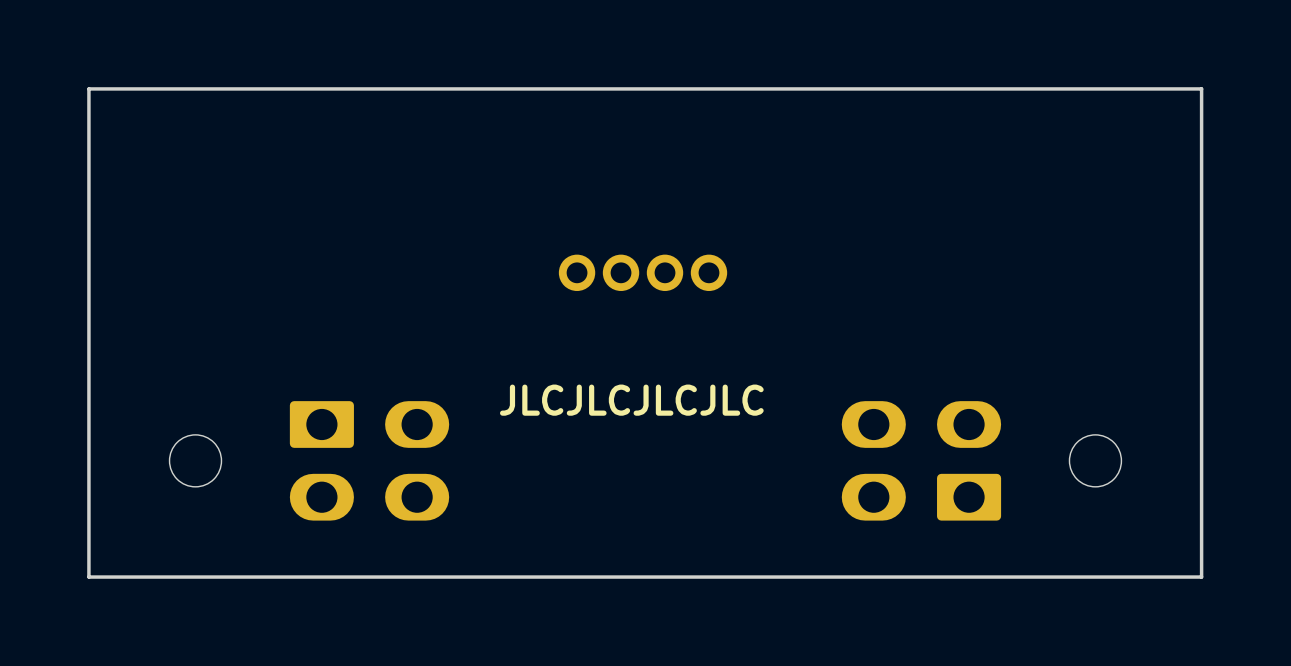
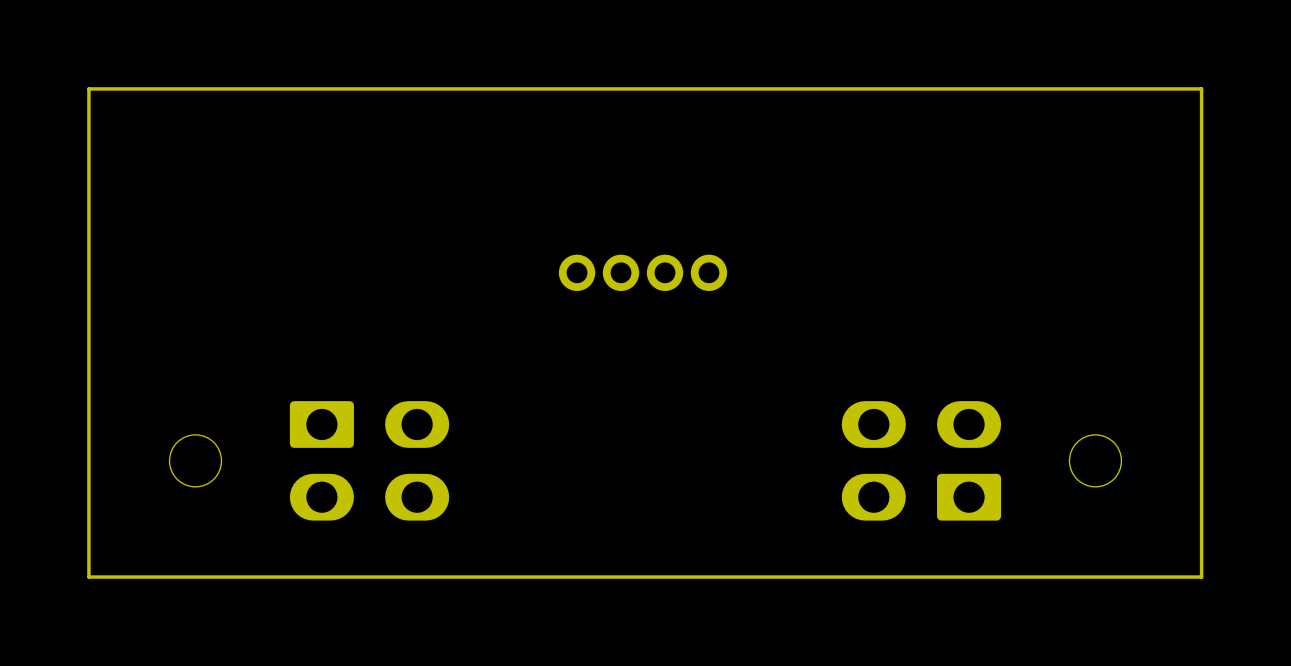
text: JLCJLCJLCJLC (631, 400) -> none

